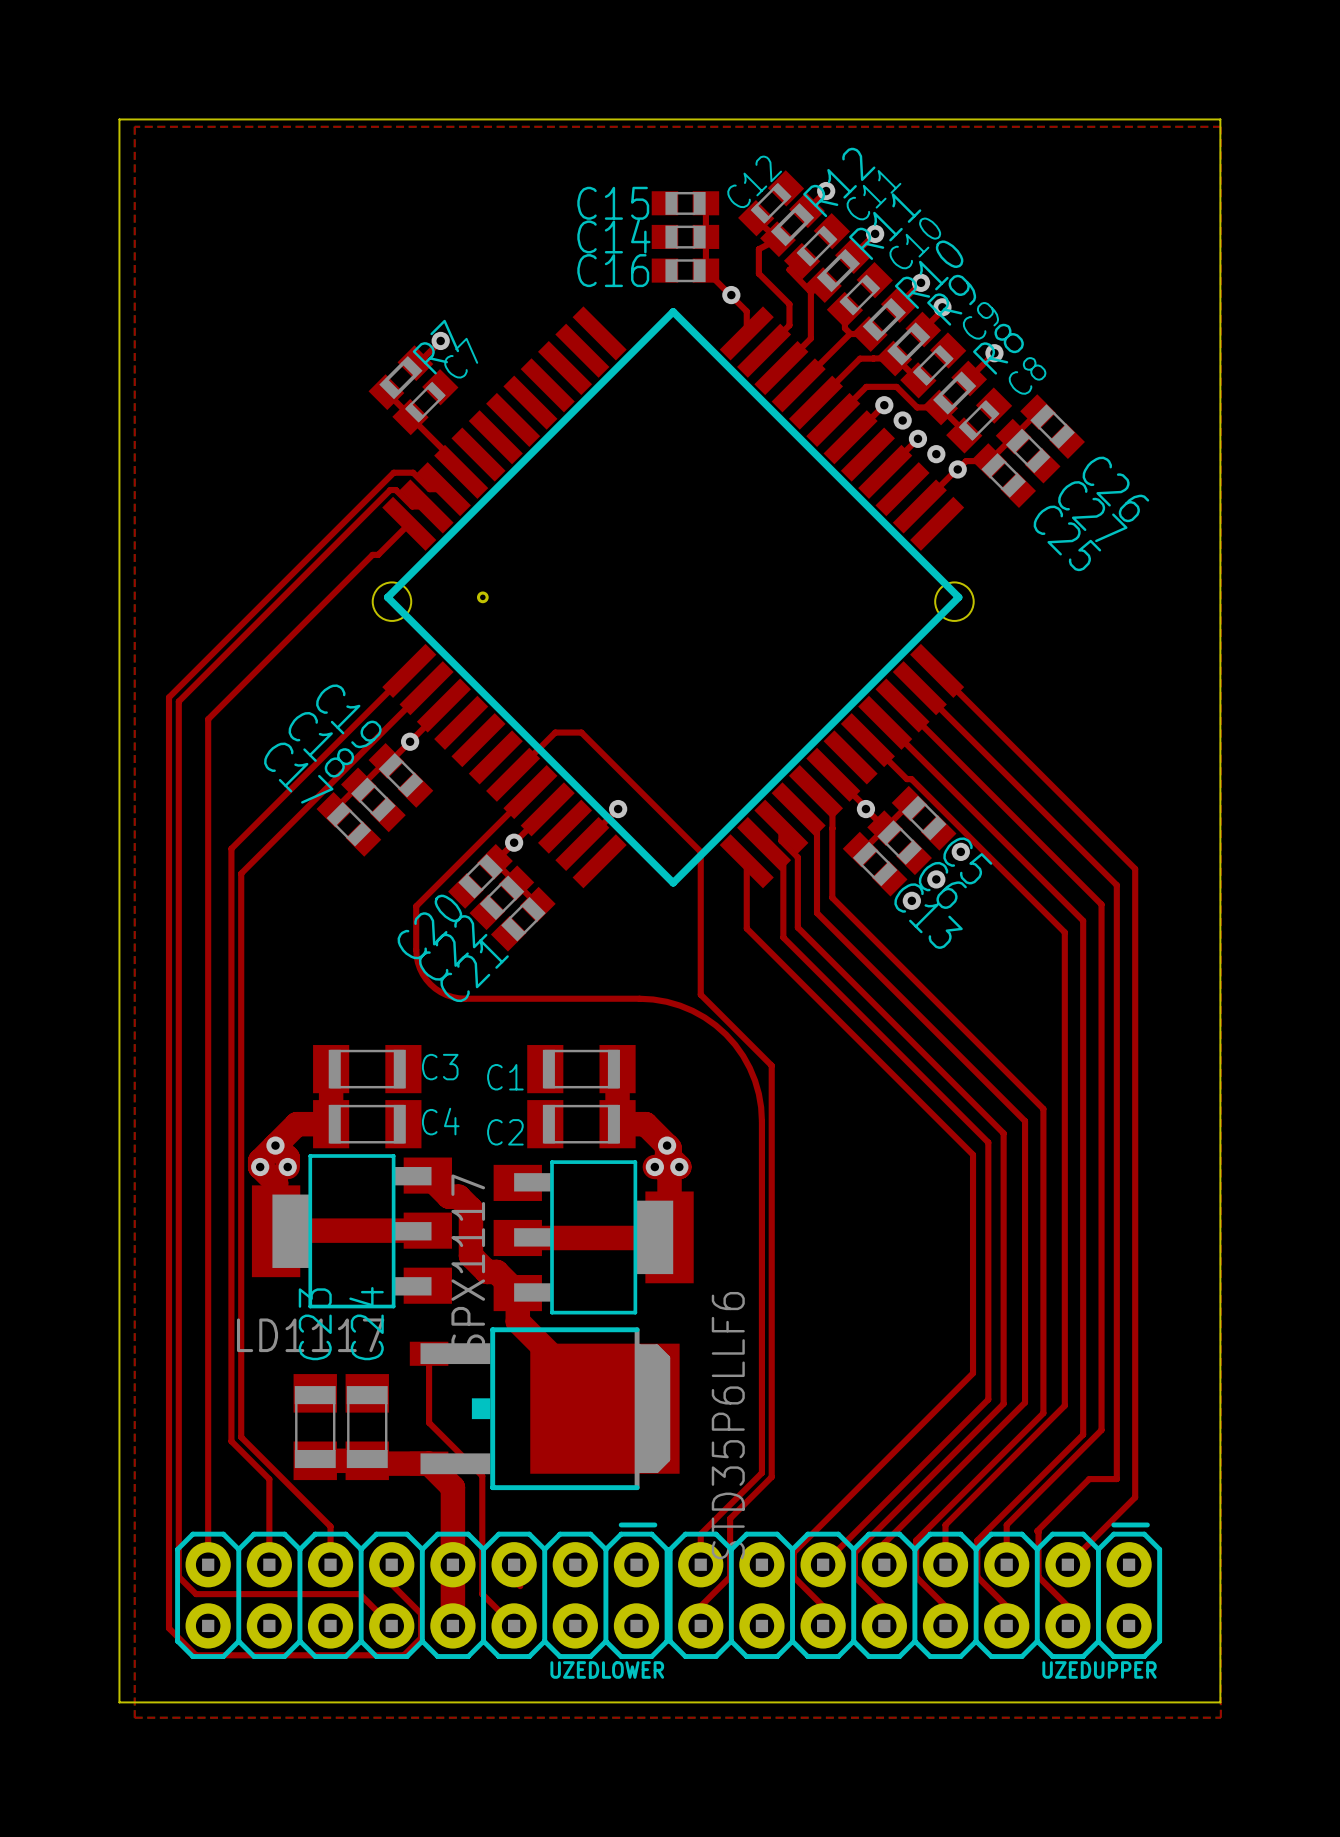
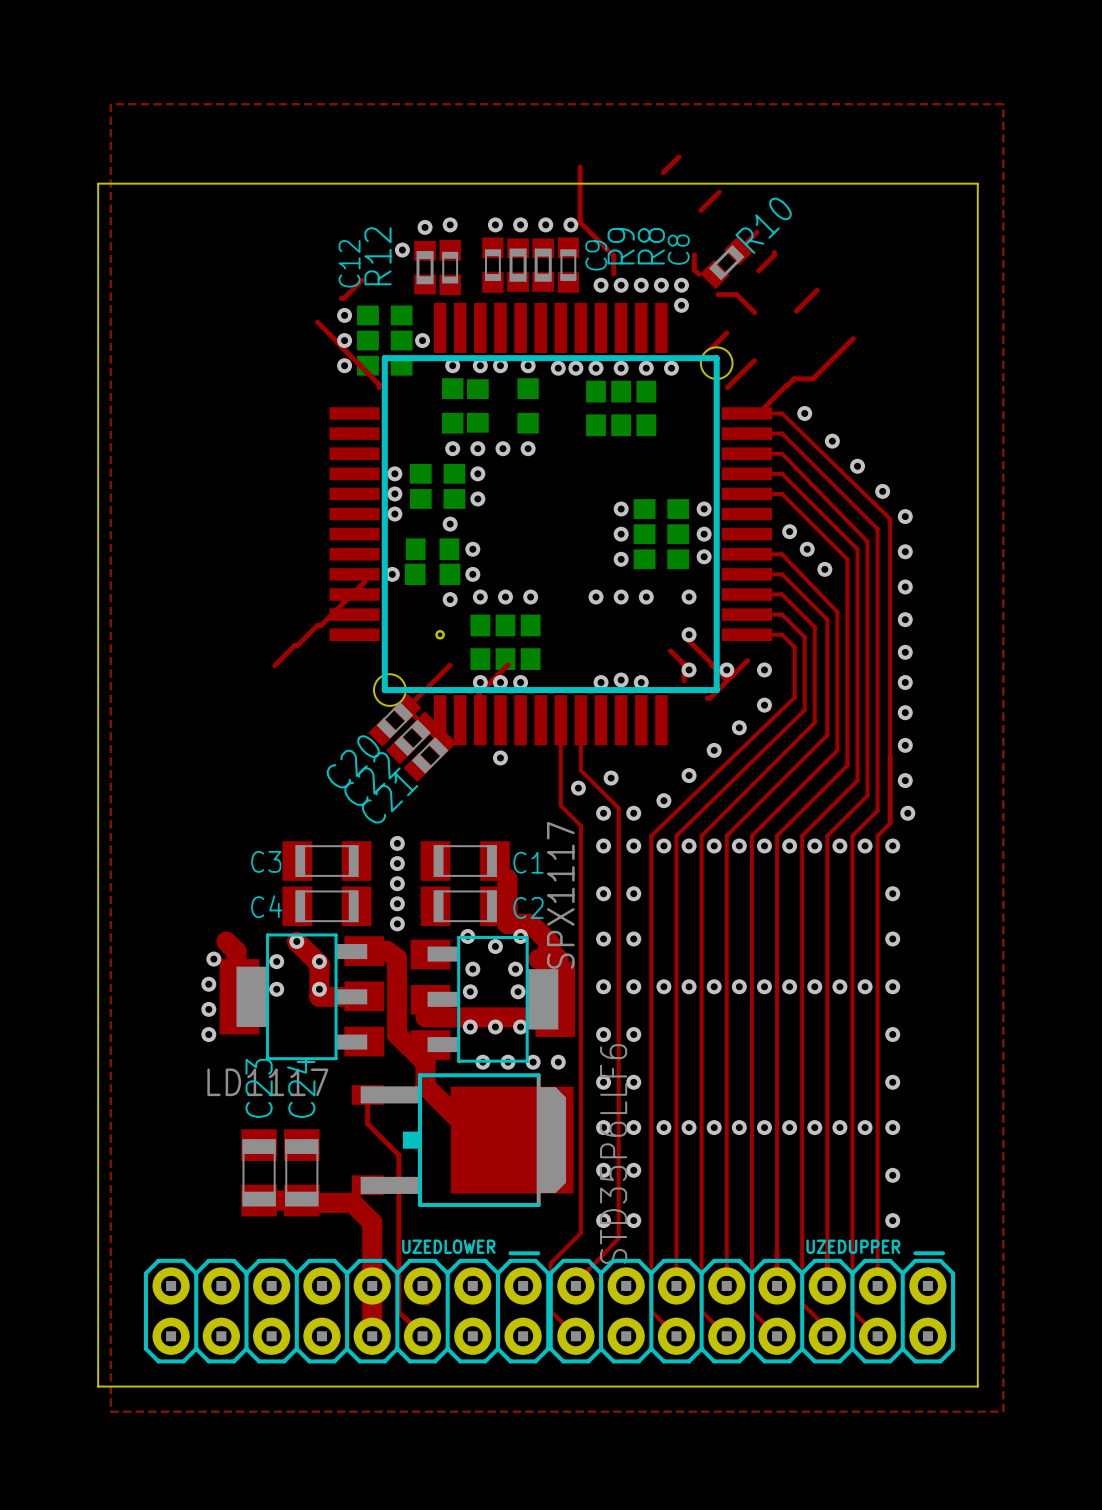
C12 name position: C12 (754, 181) -> C12 (349, 263)
R12 name position: R12 (839, 182) -> R12 (378, 256)
via: (826, 191) -> none
C15 side: top (685, 203) -> bottom (384, 340)
C12 rotation: 0° (771, 203) -> 45° counterclockwise (450, 267)
C12 position: (771, 203) -> (450, 267)
top track: (756, 218) (750, 214) (778, 239) (758, 249) (758, 273) (789, 304) (789, 325) (764, 350) -> none
board edge: (119, 223) (119, 119) (1220, 119) (1220, 1702) (119, 1702) (119, 1687) -> (98, 183) (977, 183) (977, 1386) (98, 1386)
R12 rotation: 0° (792, 224) -> 45° counterclockwise (425, 267)
R12 position: (792, 224) -> (425, 267)
via: (875, 233) -> none
C14 side: top (685, 236) -> bottom (384, 365)
C11 side: top (817, 246) -> bottom (452, 405)
top track: (802, 261) (789, 269) (810, 292) -> none
C16 side: top (685, 270) -> bottom (384, 315)
R11 side: top (838, 270) -> bottom (477, 405)
via: none -> (450, 224)
via: none -> (495, 224)
via: none -> (520, 224)
via: none -> (545, 224)
via: none -> (570, 224)
via: none -> (425, 227)
via: (921, 282) -> none
top track: (810, 292) (810, 338) (781, 368) -> none
via: (731, 295) -> none
C10 side: top (859, 295) -> bottom (528, 405)
R9 name position: R9 (951, 300) -> R9 (621, 246)
via: none -> (402, 250)
via: (942, 307) -> none
C9 name position: C9 (980, 320) -> C9 (596, 255)
top track: (869, 334) (850, 334) (798, 385) -> none
via: (440, 340) -> none
R9 rotation: 0° (908, 344) -> 45° counterclockwise (518, 265)
R9 position: (908, 344) -> (518, 265)
via: none -> (601, 285)
via: none -> (621, 285)
via: none -> (641, 285)
via: none -> (661, 285)
via: none -> (681, 285)
R8 name position: R8 (998, 349) -> R8 (651, 246)
via: (994, 353) -> none
top track: (873, 358) (860, 358) (815, 402) -> none
C9 rotation: 0° (933, 365) -> 45° counterclockwise (492, 265)
C9 position: (933, 365) -> (492, 265)
via: none -> (681, 305)
C8 name position: C8 (1027, 375) -> C8 (678, 249)
R7 side: top (400, 377) -> bottom (432, 549)
via: none -> (344, 315)
R8 rotation: 0° (954, 392) -> 45° counterclockwise (543, 265)
R8 position: (954, 392) -> (543, 265)
C7 side: top (425, 402) -> bottom (432, 574)
via: (884, 405) -> none
via: none -> (344, 340)
via: none -> (422, 340)
top track: (833, 419) (866, 386) (896, 386) (917, 407) (940, 407) (964, 431) (964, 435) -> none
via: (902, 420) -> none
C8 rotation: 0° (979, 420) -> 45° counterclockwise (568, 265)
C8 position: (979, 420) -> (568, 265)
C26 side: top (1052, 426) -> bottom (646, 408)
via: (917, 438) -> none
via: none -> (344, 365)
via: none -> (452, 365)
via: none -> (480, 365)
via: none -> (500, 365)
via: none -> (528, 365)
via: none -> (558, 368)
via: none -> (575, 368)
via: none -> (596, 368)
via: none -> (621, 368)
via: none -> (646, 368)
via: none -> (671, 368)
C27 side: top (1028, 451) -> bottom (621, 408)
via: (936, 454) -> none
via: (957, 469) -> none
C25 side: top (1003, 475) -> bottom (596, 408)
top track: (443, 489) (429, 489) (413, 472) (393, 472) (169, 697) (169, 1628) (196, 1655) (403, 1655) (421, 1638) (421, 1613) (391, 1584) (391, 1564) -> none
via: none -> (804, 413)
top track: (426, 506) (412, 506) (395, 490) (390, 490) (178, 701) (178, 1576) (196, 1594) (359, 1594) (391, 1625) -> none
top track: (409, 523) (378, 554) (372, 554) (208, 719) (208, 1564) -> none
via: none -> (832, 441)
via: none -> (452, 448)
via: none -> (477, 448)
via: none -> (502, 448)
via: none -> (528, 448)
via: none -> (857, 466)
via: none -> (394, 473)
part: none -> (437, 473)
via: none -> (477, 473)
top track: none -> (746, 473) (782, 473) (857, 549) (857, 780) (802, 835) (802, 1303) (827, 1328)
part: (673, 597) -> none
via: none -> (882, 491)
via: none -> (394, 493)
part: none -> (437, 498)
via: none -> (477, 498)
via: none -> (621, 509)
via: none -> (704, 509)
via: none -> (394, 514)
via: none -> (905, 516)
via: none -> (450, 524)
part: none -> (550, 524)
via: none -> (789, 531)
via: none -> (621, 534)
via: none -> (704, 534)
via: none -> (472, 549)
via: none -> (807, 549)
top track: (409, 670) (231, 848) (231, 1441) (269, 1479) (269, 1564) -> none
top track: (937, 670) (1135, 868) (1135, 1497) (1067, 1564) -> none
via: none -> (905, 551)
via: none -> (704, 556)
via: none -> (621, 559)
top track: (426, 688) (241, 873) (241, 1437) (330, 1526) (330, 1564) -> none
top track: (919, 688) (1116, 885) (1116, 1479) (1089, 1479) (1037, 1531) (1038, 1576) (1067, 1606) (1067, 1625) -> (746, 433) (782, 433) (877, 529) (877, 810) (852, 835) (852, 1311) (877, 1336)
via: none -> (824, 569)
via: none -> (392, 574)
via: none -> (472, 574)
top track: (902, 705) (1101, 904) (1101, 1430) (1006, 1524) -> (746, 453) (782, 453) (867, 541) (867, 795) (827, 835) (827, 1253)
via: none -> (905, 586)
top track: (885, 722) (1083, 920) -> (746, 413) (782, 413) (890, 519) (890, 756)
via: none -> (480, 597)
via: none -> (505, 597)
via: none -> (530, 597)
via: none -> (596, 597)
via: none -> (621, 597)
via: none -> (646, 597)
via: none -> (689, 597)
via: none -> (450, 599)
top track: (867, 740) (906, 779) (911, 779) (1064, 932) (1064, 1405) (945, 1524) -> (746, 493) (782, 493) (847, 559) (847, 765) (777, 835) (777, 1253)
via: (410, 741) -> none
via: none -> (905, 619)
via: none -> (689, 634)
top track: (513, 774) (555, 732) (581, 732) (700, 851) (700, 994) (771, 1065) (771, 1477) (730, 1518) (730, 1576) (700, 1606) (700, 1625) -> (560, 720) (560, 805) (580, 825) (580, 1233) (550, 1263) (550, 1311) (575, 1336)
C19 side: top (400, 775) -> bottom (480, 642)
top track: (530, 792) (416, 906) (416, 956) (419, 968) (426, 979) (440, 992) (458, 998) (639, 998) (666, 1001) (679, 1005) (692, 1010) (715, 1025) (735, 1044) (749, 1068) (758, 1093) (761, 1121) (761, 1472) (700, 1534) (700, 1561) -> (580, 720) (580, 770) (618, 808) (618, 1238) (575, 1283)
via: none -> (905, 652)
C18 side: top (373, 799) -> bottom (505, 642)
via: (618, 809) -> none
top track: (798, 809) (817, 827) (817, 913) (1025, 1121) (1025, 1402) (884, 1543) -> (746, 574) (782, 574) (827, 619) (827, 735) (726, 835) (726, 1268)
via: (865, 809) -> none
via: none -> (689, 669)
via: none -> (726, 669)
via: none -> (764, 669)
C5 side: top (924, 818) -> bottom (661, 509)
C17 side: top (348, 824) -> bottom (530, 642)
top track: (781, 826) (781, 840) (797, 857) (797, 927) (1003, 1133) (1003, 1403) (854, 1552) (854, 1576) (884, 1606) (884, 1625) -> (746, 594) (782, 594) (814, 627) (814, 722) (701, 835) (701, 1311) (726, 1336)
via: none -> (621, 680)
top track: (832, 828) (832, 897) (1043, 1108) (1043, 1413) (916, 1540) (916, 1576) (945, 1606) (945, 1625) -> (746, 554) (782, 554) (837, 612) (837, 750) (751, 835) (751, 1311) (777, 1336)
via: none -> (480, 682)
via: none -> (500, 682)
via: none -> (520, 682)
via: none -> (601, 682)
via: none -> (641, 682)
via: none -> (905, 682)
via: (514, 842) -> none
C6 side: top (899, 842) -> bottom (661, 534)
top track: (764, 843) (783, 863) (783, 937) (988, 1142) (988, 1399) (823, 1564) -> (746, 614) (782, 614) (804, 637) (804, 710) (676, 835) (676, 1285)
via: (960, 851) -> none
via: none -> (764, 705)
top track: (746, 861) (746, 928) (973, 1154) (973, 1373) (793, 1552) (793, 1576) (823, 1606) (823, 1625) -> (746, 634) (782, 634) (794, 647) (794, 697) (651, 835) (651, 1311) (676, 1336)
C13 side: top (875, 864) -> bottom (661, 559)
via: none -> (905, 712)
via: (936, 879) -> none
via position: (911, 900) -> (739, 727)
via: none -> (905, 745)
via: none -> (714, 750)
via: none -> (500, 757)
via: none -> (689, 775)
via: none -> (611, 778)
via: none -> (905, 780)
via: none -> (578, 788)
via: none -> (663, 800)
via: none -> (603, 813)
via: none -> (633, 813)
via: none -> (907, 813)
top track: (1083, 1001) (1083, 1434) (977, 1540) (977, 1576) (1006, 1606) (1006, 1616) -> (890, 823) (877, 835) (877, 1285)
via: none -> (397, 843)
via: none -> (603, 845)
via: none -> (633, 845)
via: none -> (663, 845)
via: none -> (689, 845)
via: none -> (714, 845)
via: none -> (739, 845)
via: none -> (764, 845)
via: none -> (789, 845)
via: none -> (814, 845)
via: none -> (839, 845)
via: none -> (865, 845)
via: none -> (892, 845)
via: none -> (397, 863)
C3 name position: C3 (440, 1067) -> C3 (266, 861)
top track: (331, 1069) (331, 1124) (296, 1124) (260, 1160) (260, 1167) (276, 1182) (276, 1231) (427, 1230) -> none
C3 position: (367, 1069) -> (326, 861)
C1 position: (581, 1069) -> (465, 861)
via: none -> (397, 883)
C1 name position: C1 (505, 1077) -> C1 (528, 862)
via: none -> (603, 893)
via: none -> (633, 893)
via: none -> (892, 893)
via: none -> (397, 903)
C4 name position: C4 (440, 1121) -> C4 (266, 906)
C4 position: (367, 1124) -> (326, 906)
via: none -> (397, 923)
C2 position: (581, 1124) -> (465, 906)
C2 name position: C2 (505, 1132) -> C2 (528, 907)
via: none -> (467, 936)
via: none -> (520, 936)
via: none -> (603, 938)
via: none -> (633, 938)
via: none -> (892, 938)
via: (275, 1145) -> none
top track: none -> (296, 941) (319, 964) (319, 996) (364, 996)
via: none -> (296, 941)
via: (667, 1145) -> none
via: none -> (495, 946)
via: (287, 1167) -> none
via: (654, 1167) -> none
via: (679, 1167) -> none
via: none -> (276, 961)
via: none -> (319, 961)
top track: (427, 1175) (448, 1196) (458, 1196) (470, 1209) (470, 1255) (487, 1271) (496, 1271) -> (364, 951) (386, 950) (397, 958) (397, 1034) (407, 1045)
via: none -> (472, 969)
via: none -> (515, 969)
via: none -> (208, 984)
via: none -> (603, 986)
via: none -> (633, 986)
via: none -> (663, 986)
via: none -> (689, 986)
via: none -> (714, 986)
via: none -> (739, 986)
via: none -> (764, 986)
via: none -> (789, 986)
via: none -> (814, 986)
via: none -> (839, 986)
via: none -> (865, 986)
via: none -> (892, 986)
via: none -> (276, 989)
via: none -> (319, 989)
via: none -> (470, 991)
via: none -> (518, 991)
via: none -> (208, 1009)
part position: (351, 1231) -> (301, 996)
part position: (593, 1237) -> (492, 999)
via: none -> (470, 1026)
via: none -> (495, 1026)
via: none -> (520, 1026)
via: none -> (208, 1034)
via: none -> (603, 1034)
via: none -> (633, 1034)
via: none -> (892, 1034)
part value position: SPX1117 (468, 1263) -> SPX1117 (560, 895)
via: none -> (482, 1062)
via: none -> (508, 1062)
via: none -> (533, 1062)
via: none -> (558, 1062)
via: none -> (603, 1082)
via: none -> (633, 1082)
via: none -> (892, 1082)
top track: none -> (367, 1095) (367, 1124) (398, 1155) (398, 1312) (425, 1336)
top track: (429, 1353) (429, 1422) (482, 1476) (482, 1594) (514, 1625) -> none
via: none -> (603, 1127)
via: none -> (633, 1127)
via: none -> (663, 1127)
via: none -> (689, 1127)
via: none -> (714, 1127)
via: none -> (739, 1127)
via: none -> (764, 1127)
via: none -> (789, 1127)
via: none -> (814, 1127)
via: none -> (839, 1127)
via: none -> (865, 1127)
via: none -> (892, 1127)
part position: (544, 1408) -> (462, 1140)
via: none -> (603, 1170)
via: none -> (633, 1170)
via: none -> (892, 1175)
via: none -> (603, 1220)
via: none -> (633, 1220)
via: none -> (892, 1220)
UZEDLOWER name position: UZEDLOWER (607, 1669) -> UZEDLOWER (448, 1246)
UZEDUPPER name position: UZEDUPPER (1099, 1669) -> UZEDUPPER (853, 1246)

